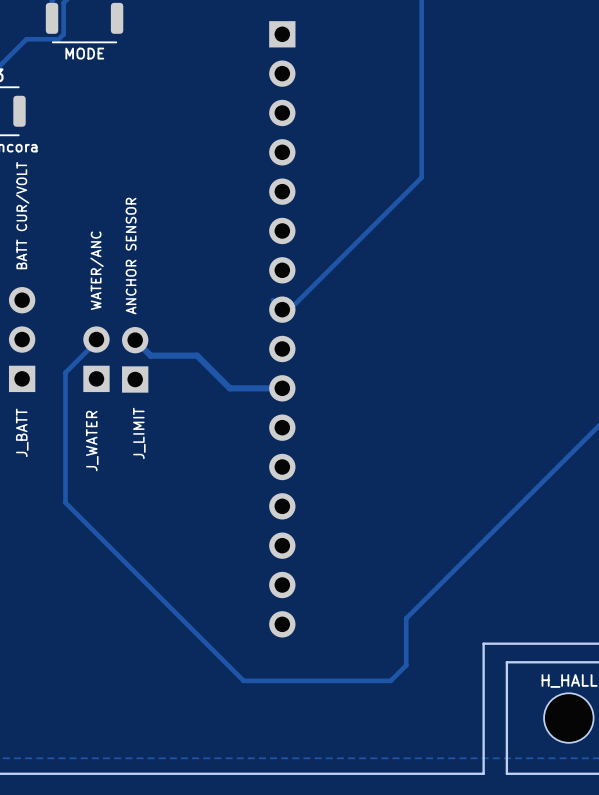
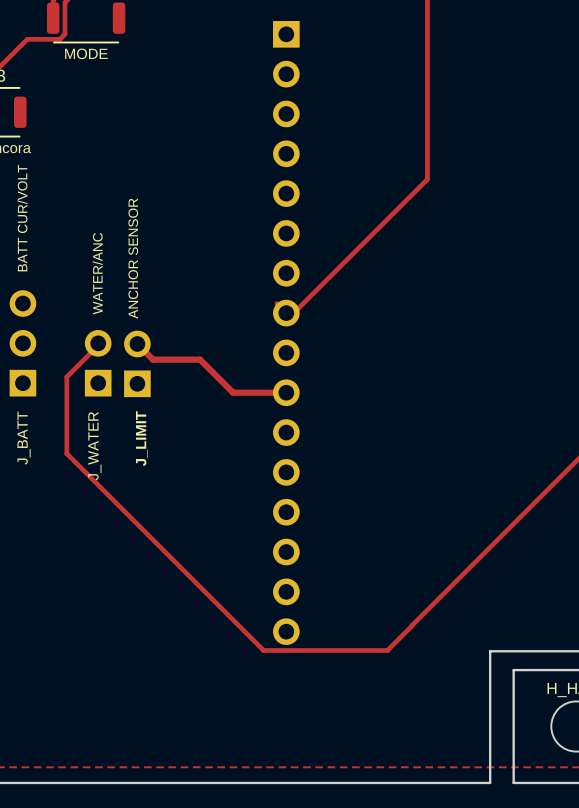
track: (65, 448) (65, 502) (243, 680) (390, 680) (406, 665) (406, 618) -> (66, 453) (263, 650) (387, 650) (411, 626)

